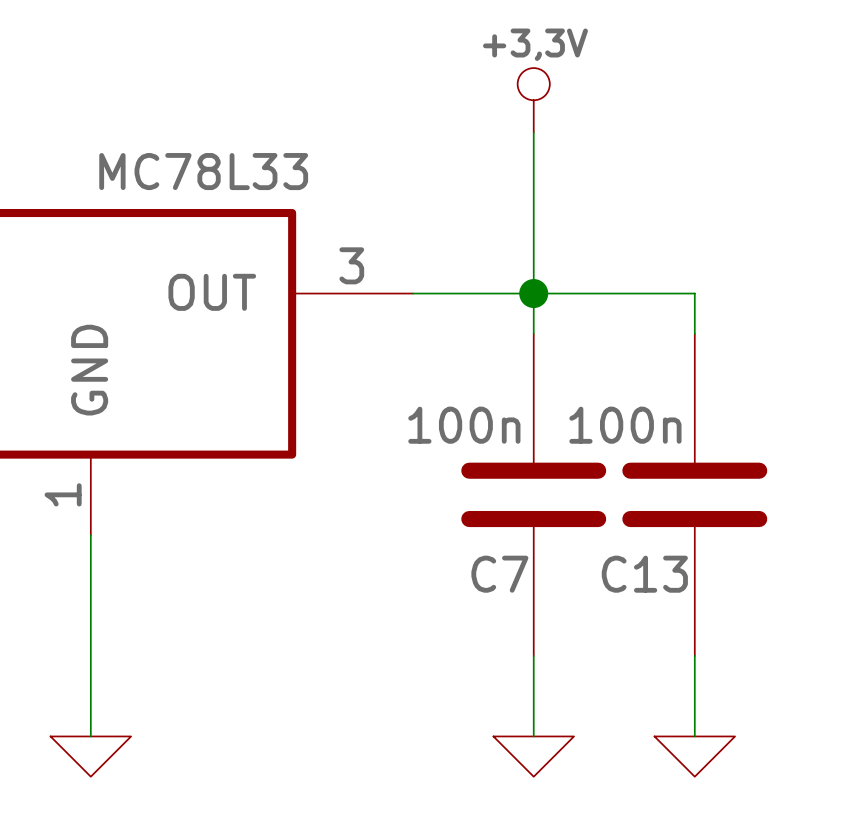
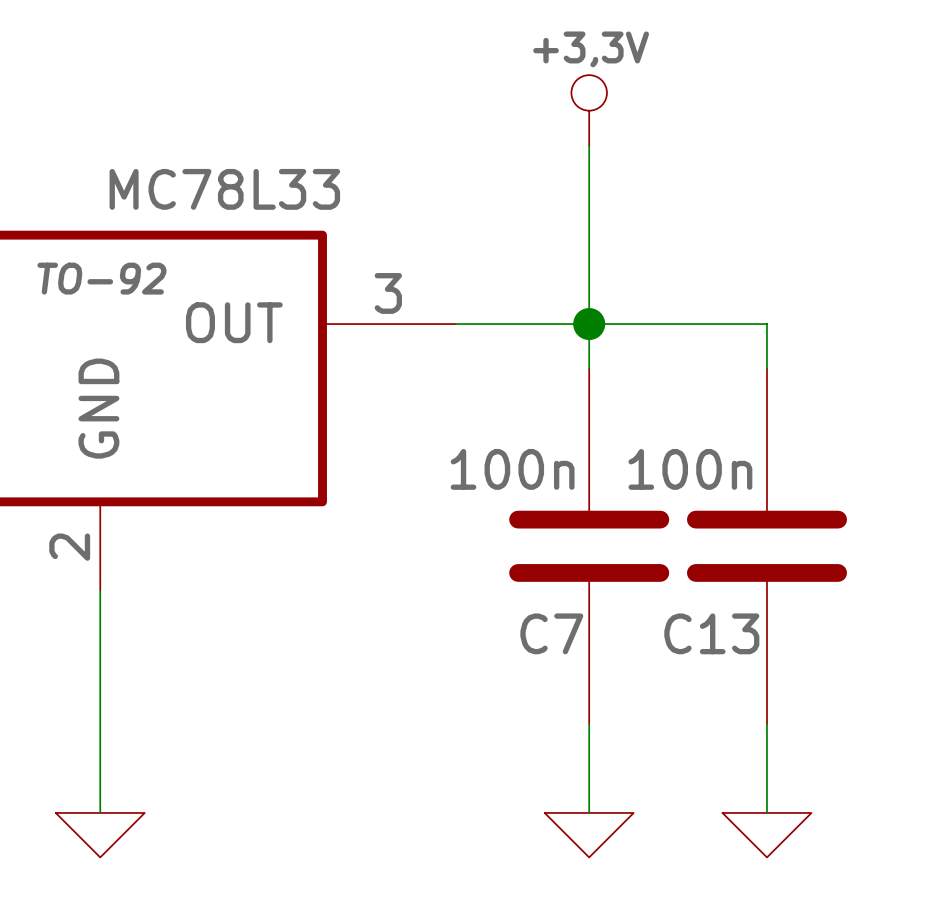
part text: none -> TO-92 (102, 278)
part pin number: 1 (63, 494) -> 2 (69, 547)

